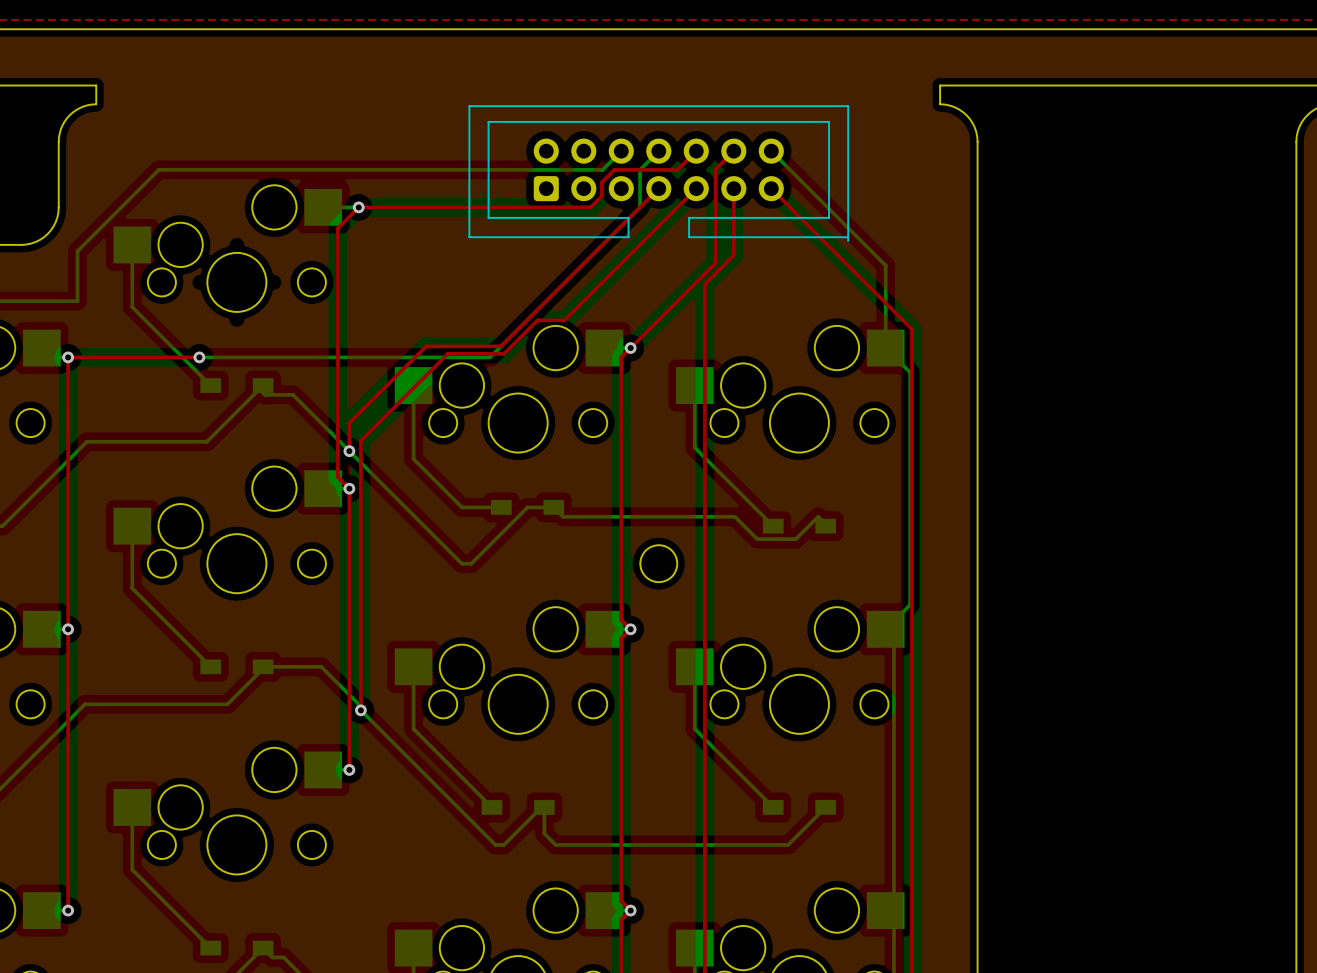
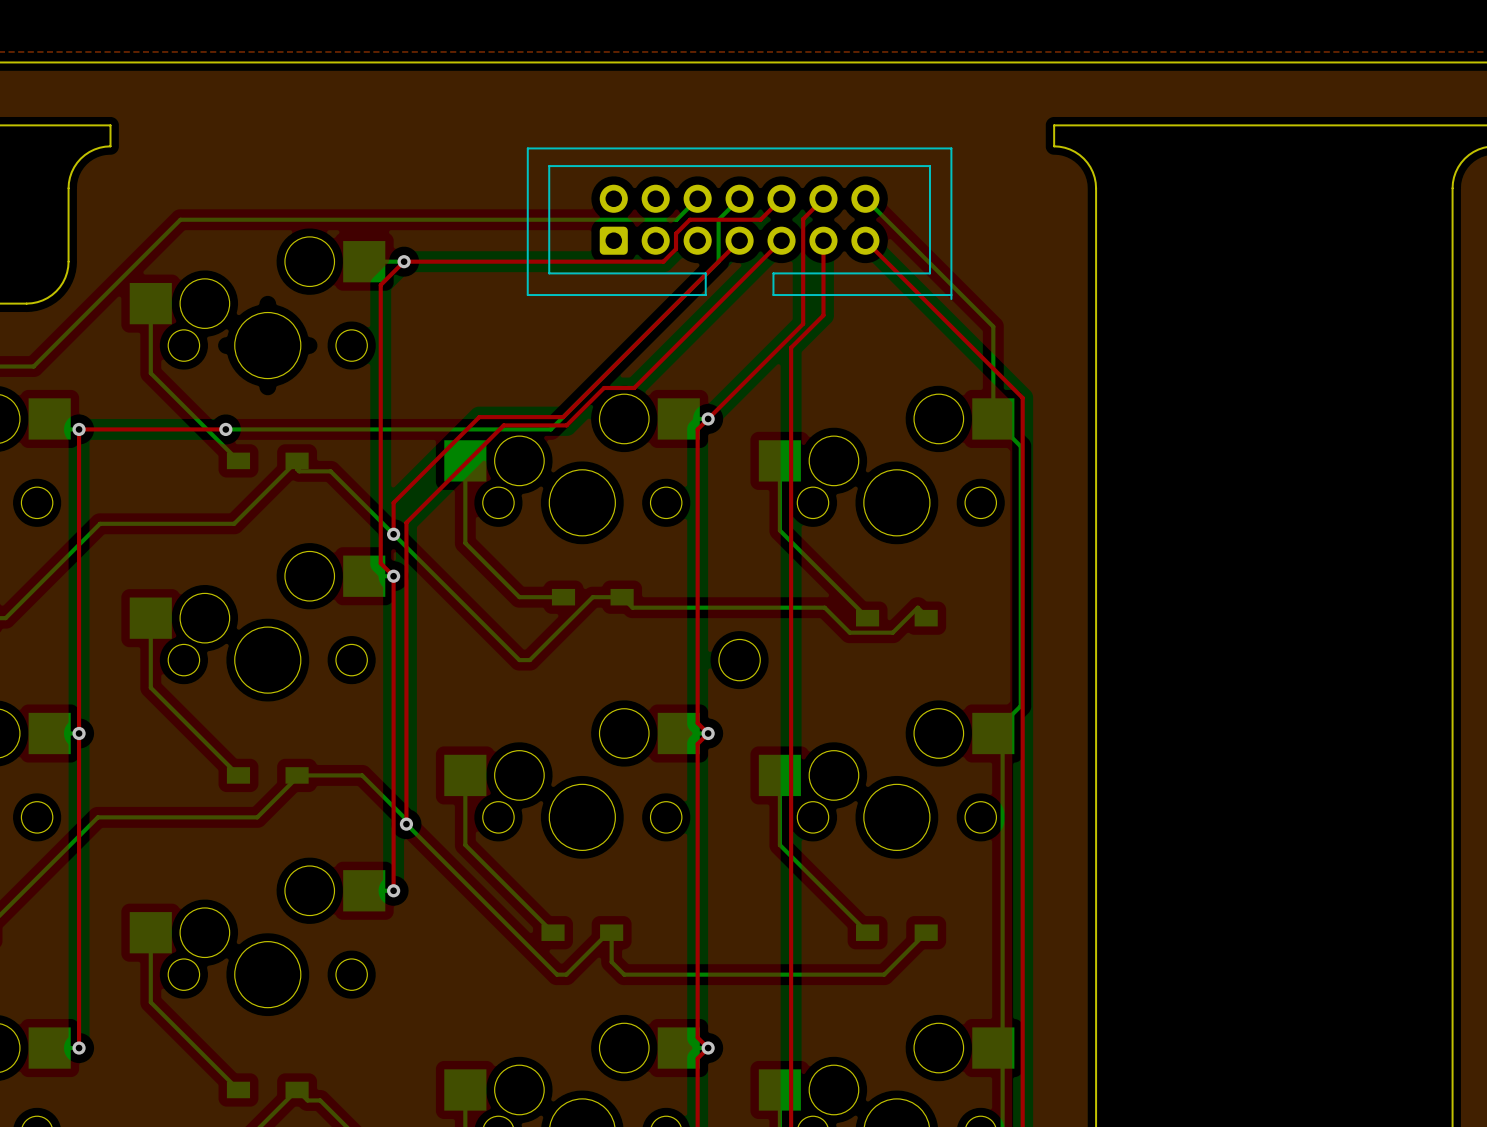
bottom track: (77, 251) (77, 301) (27, 301) -> (89, 310) (33, 366)

